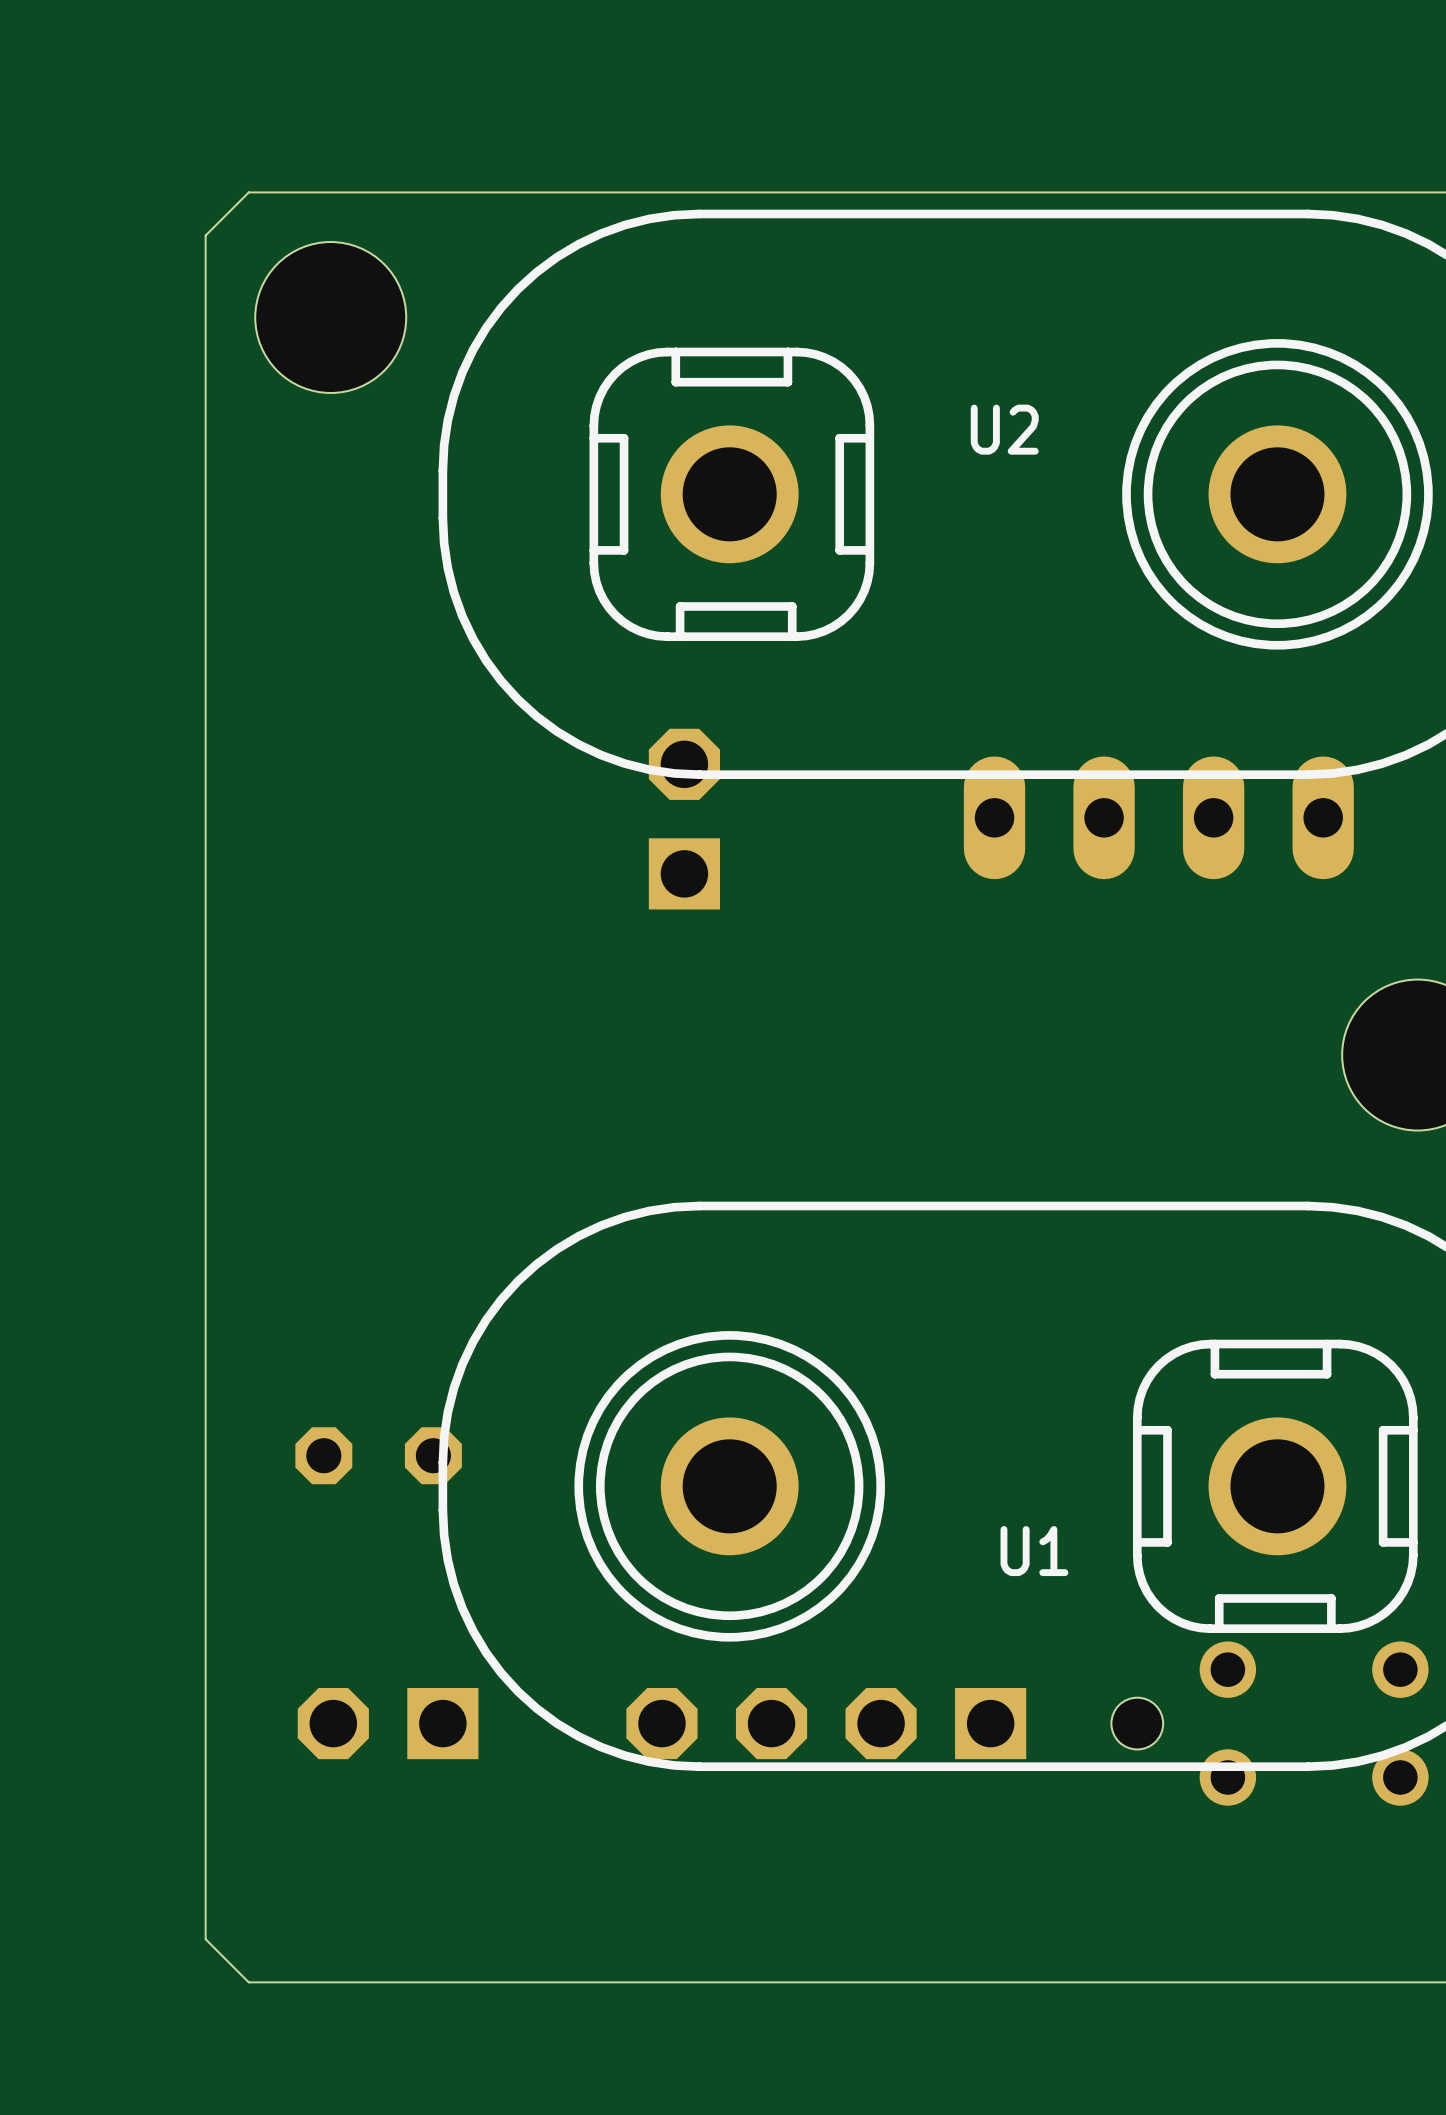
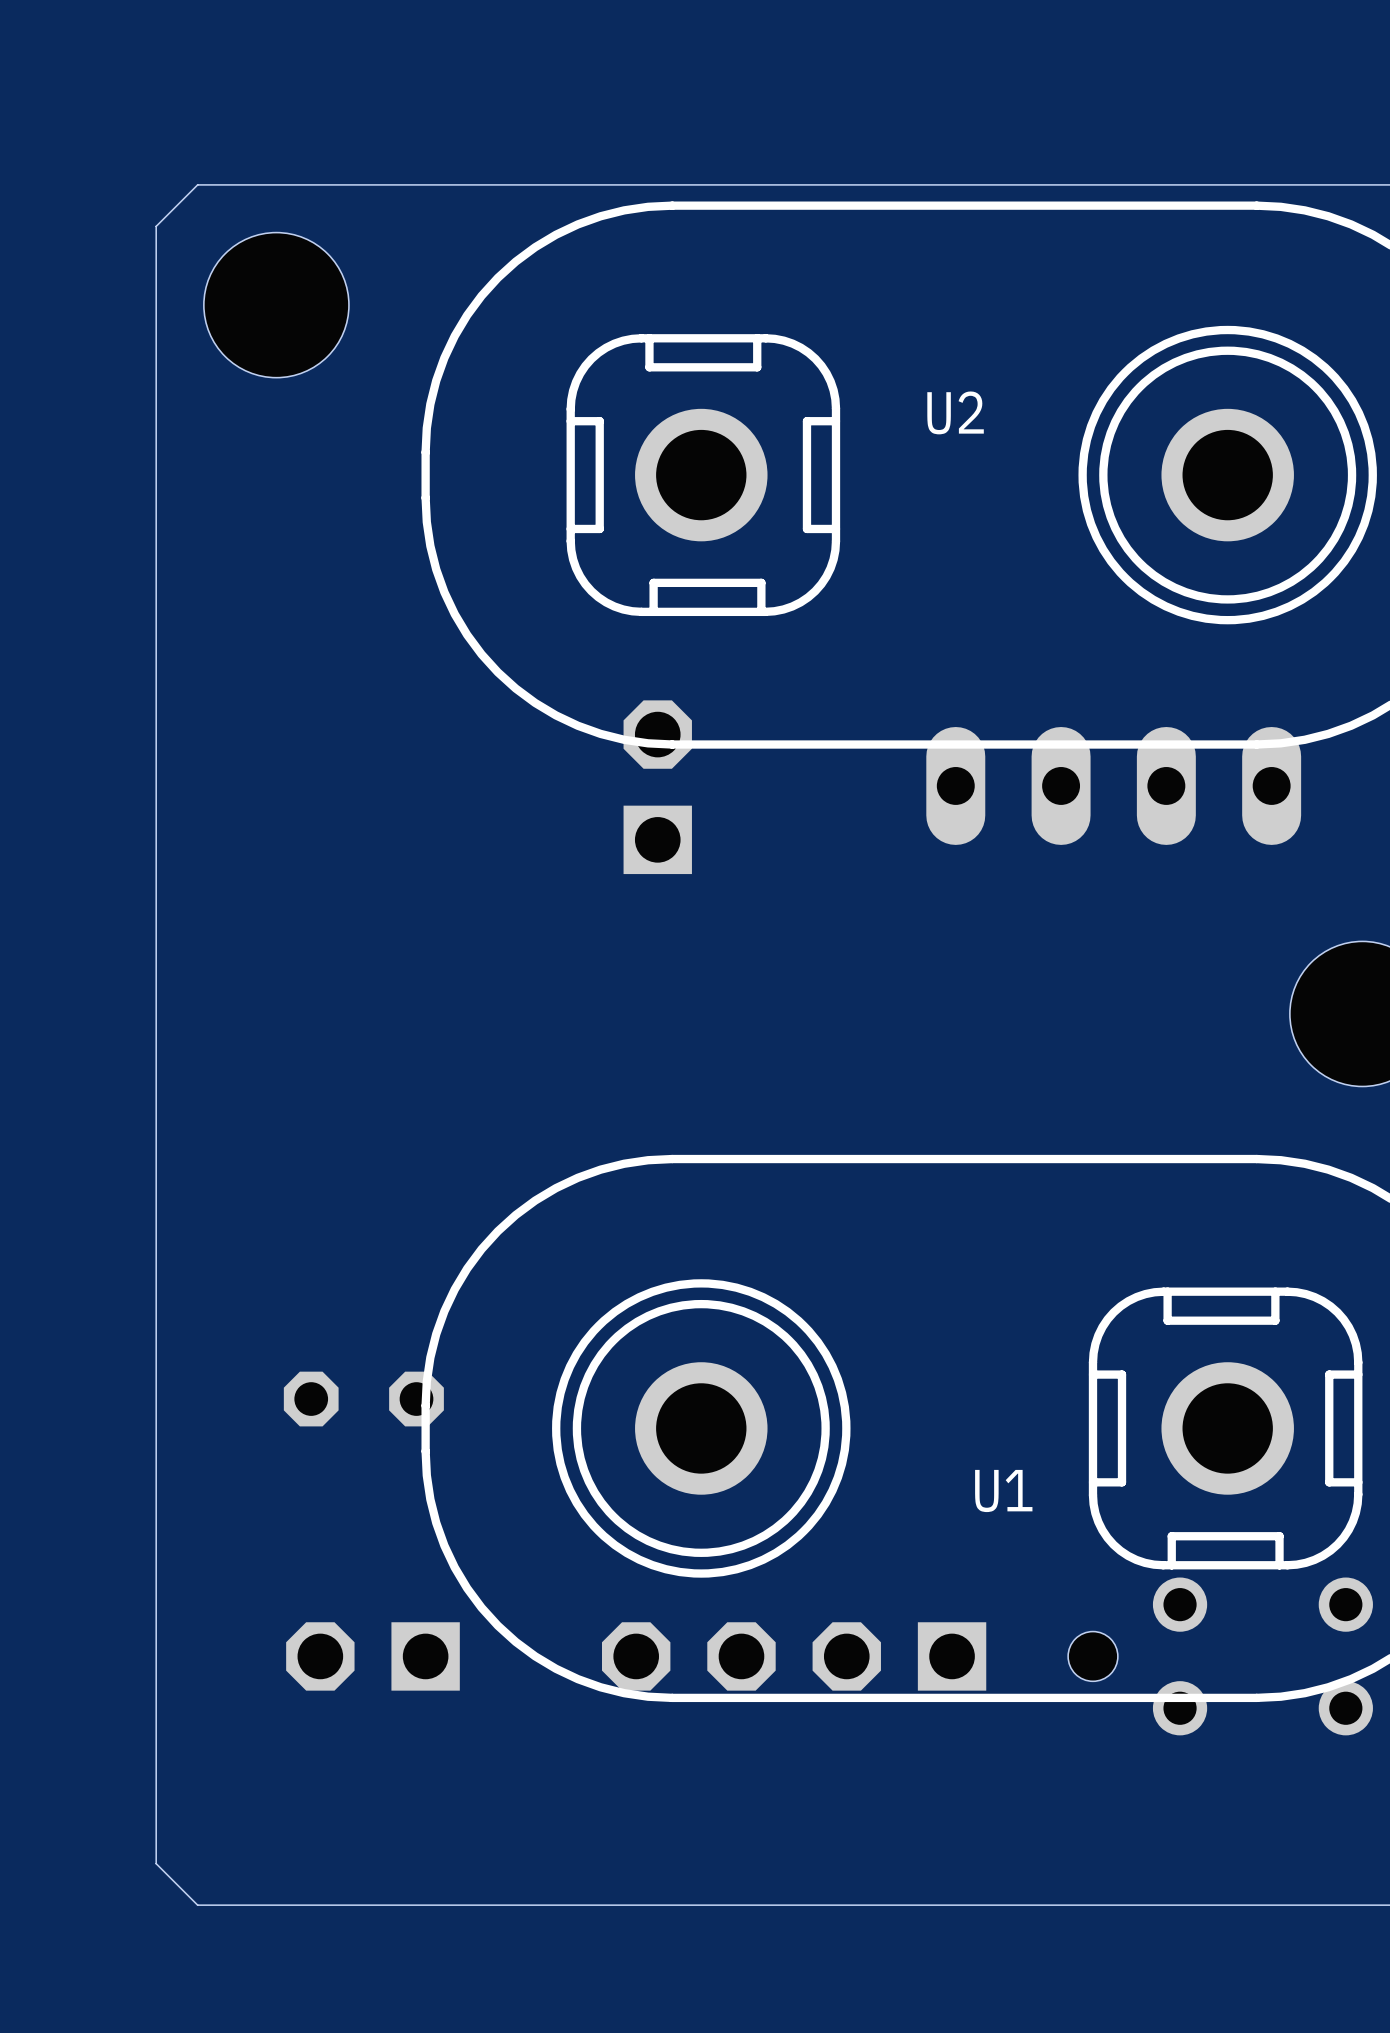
board edge: (248, 192) (205, 235) (205, 1939) (248, 1982) -> (239, 184) (197, 184) (156, 226) (156, 1863) (197, 1905) (239, 1905)
hole position: (330, 317) -> (276, 305)

